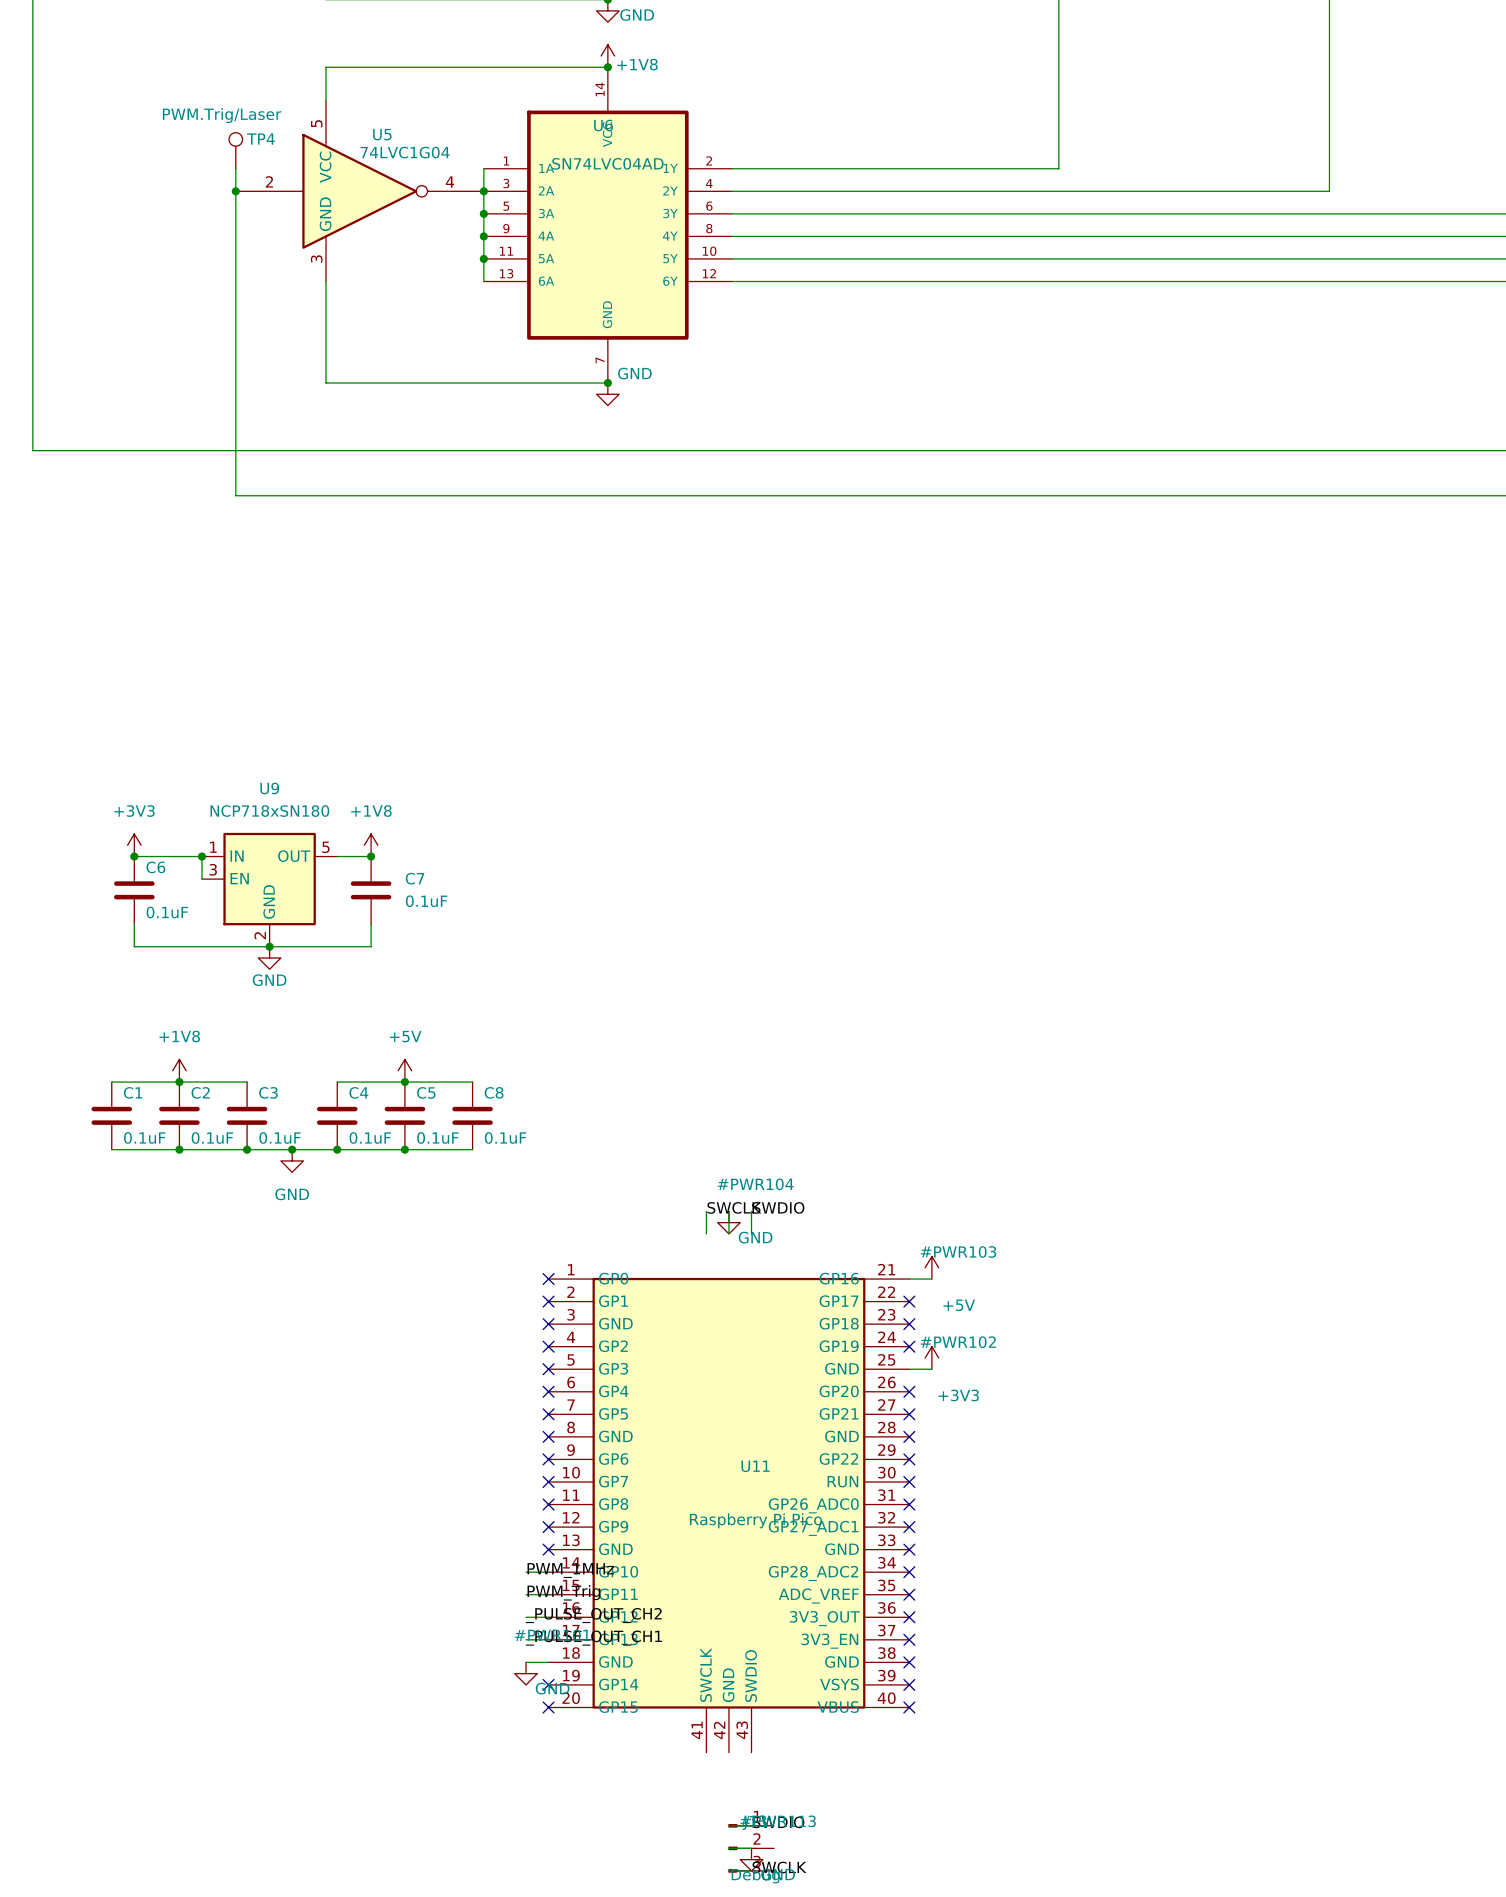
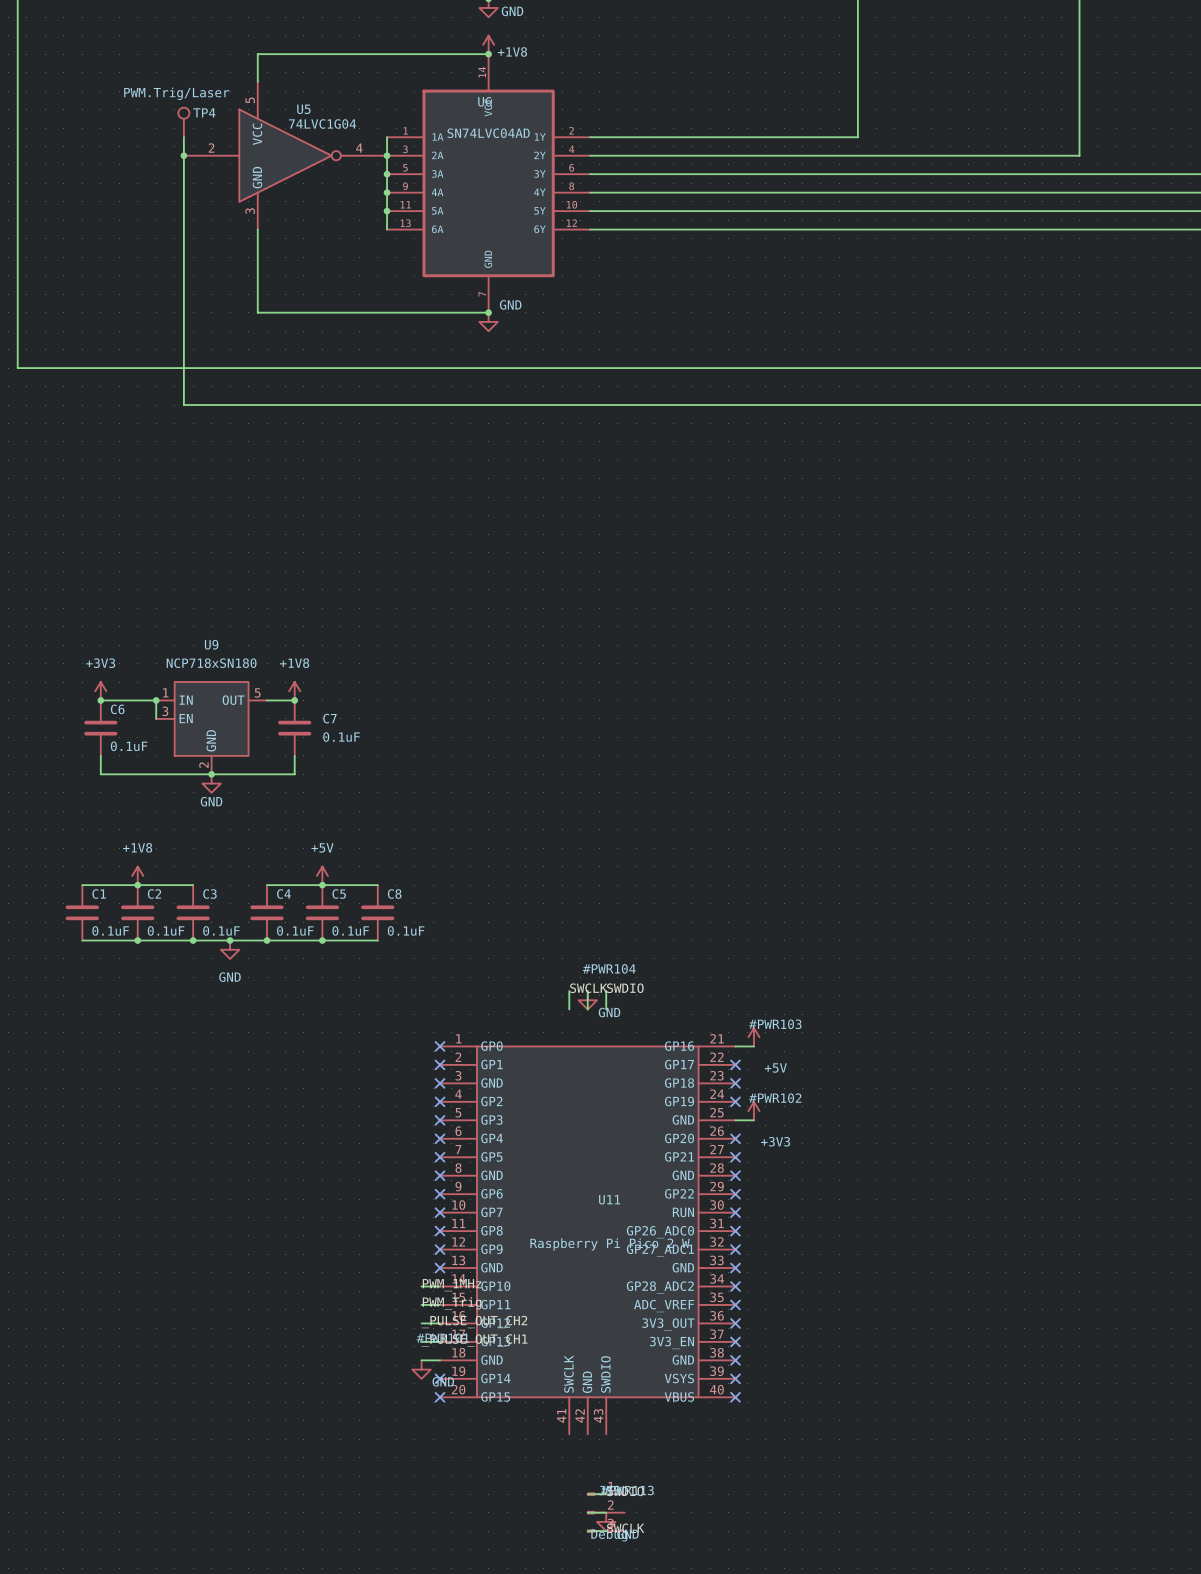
U11 value: Raspberry Pi Pico (755, 1520) -> Raspberry Pi Pico 2 W (610, 1244)

